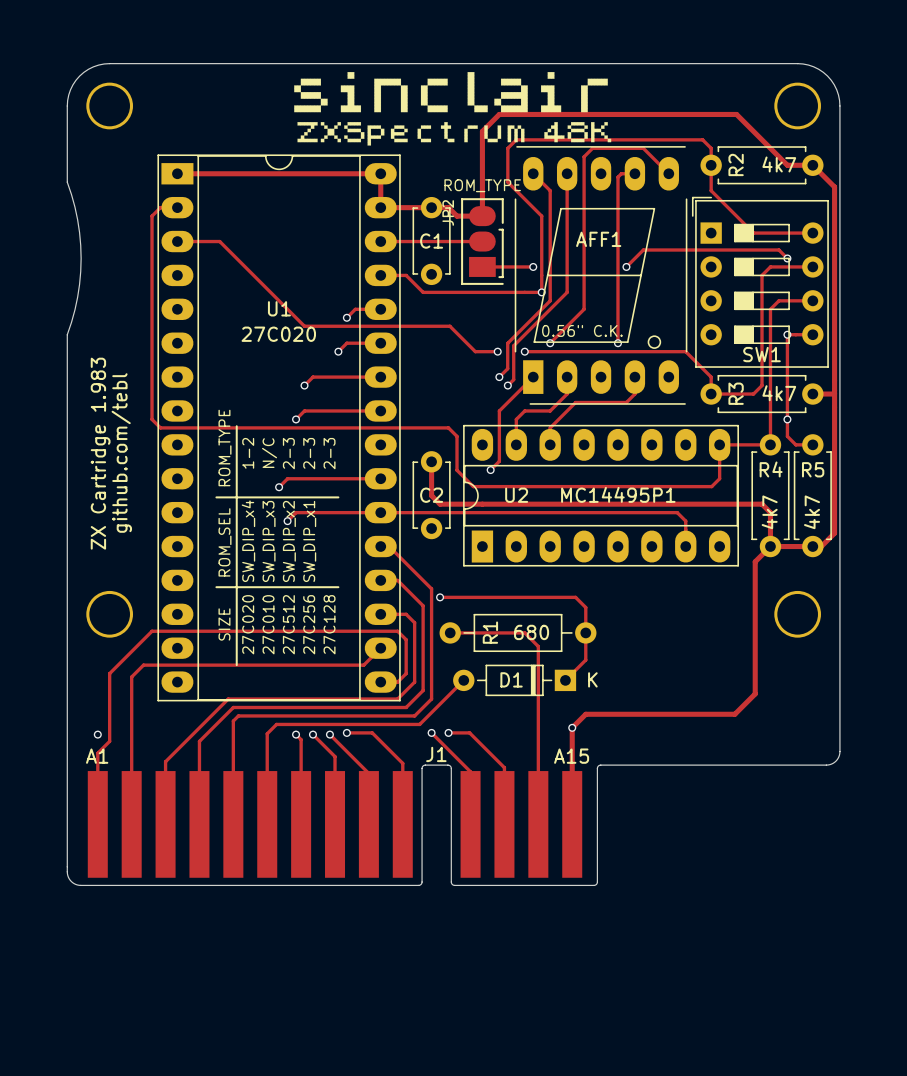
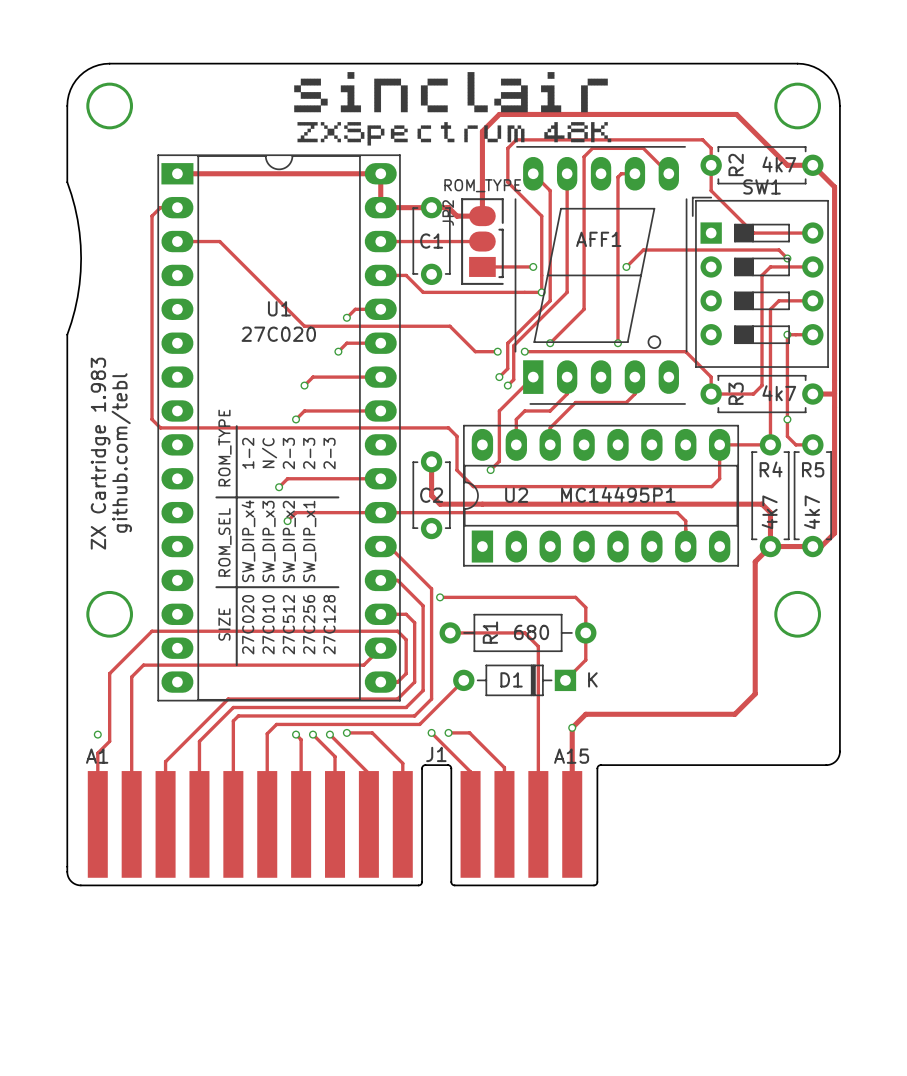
AFF1 value: 0.56" C.K. (582, 330) -> none
SW1 name position: SW1 (762, 354) -> SW1 (762, 186)

